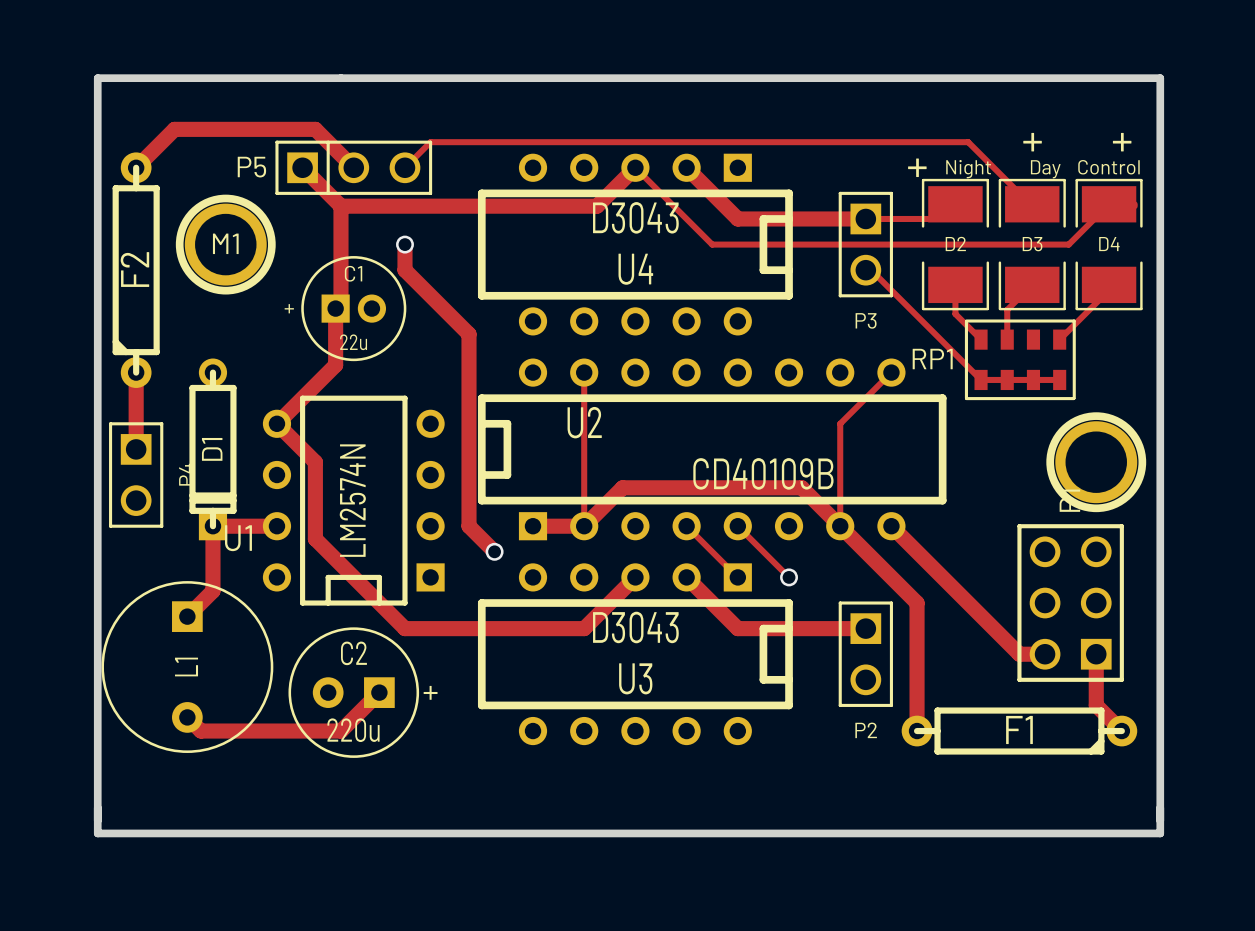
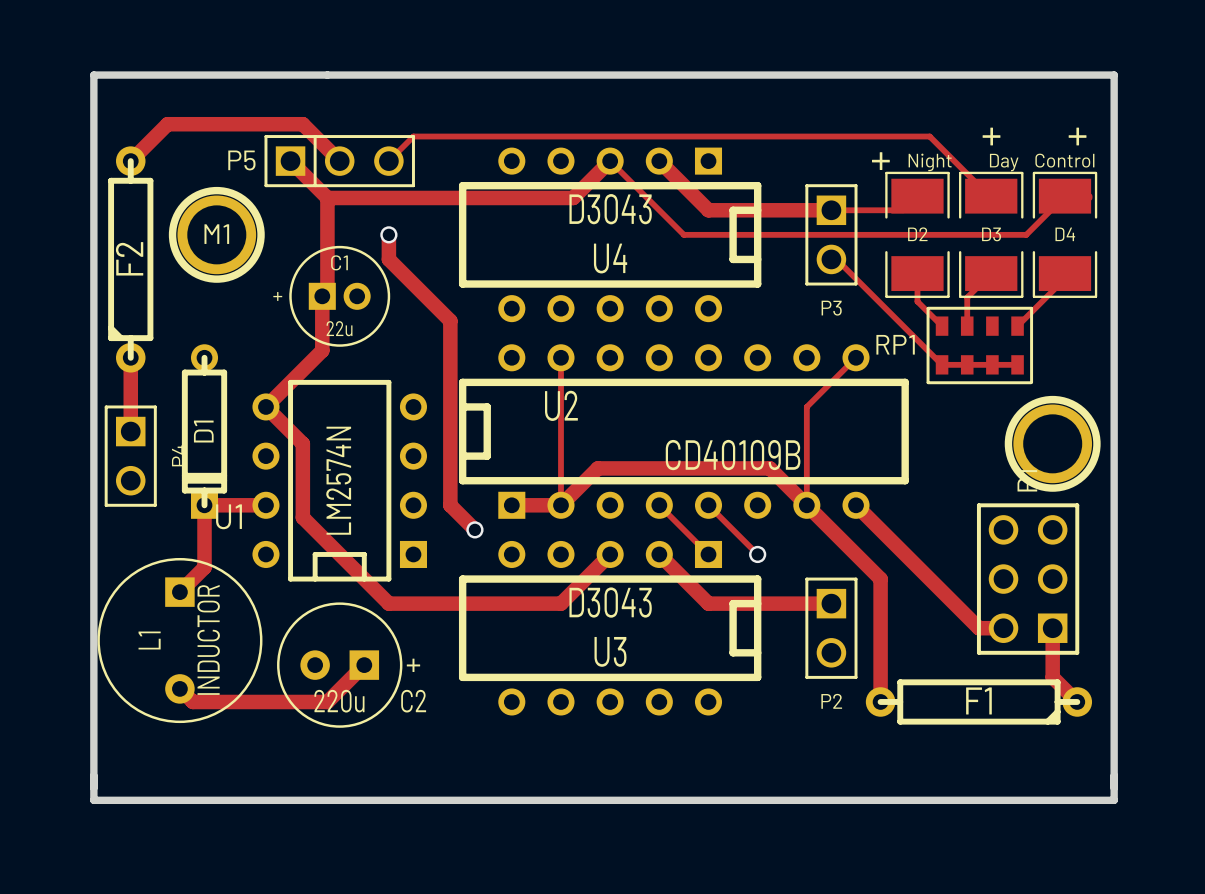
C2 name position: C2 (353, 653) -> C2 (413, 701)
L1 value: none -> INDUCTOR (208, 639)
L1 name position: L1 (186, 667) -> L1 (149, 640)

